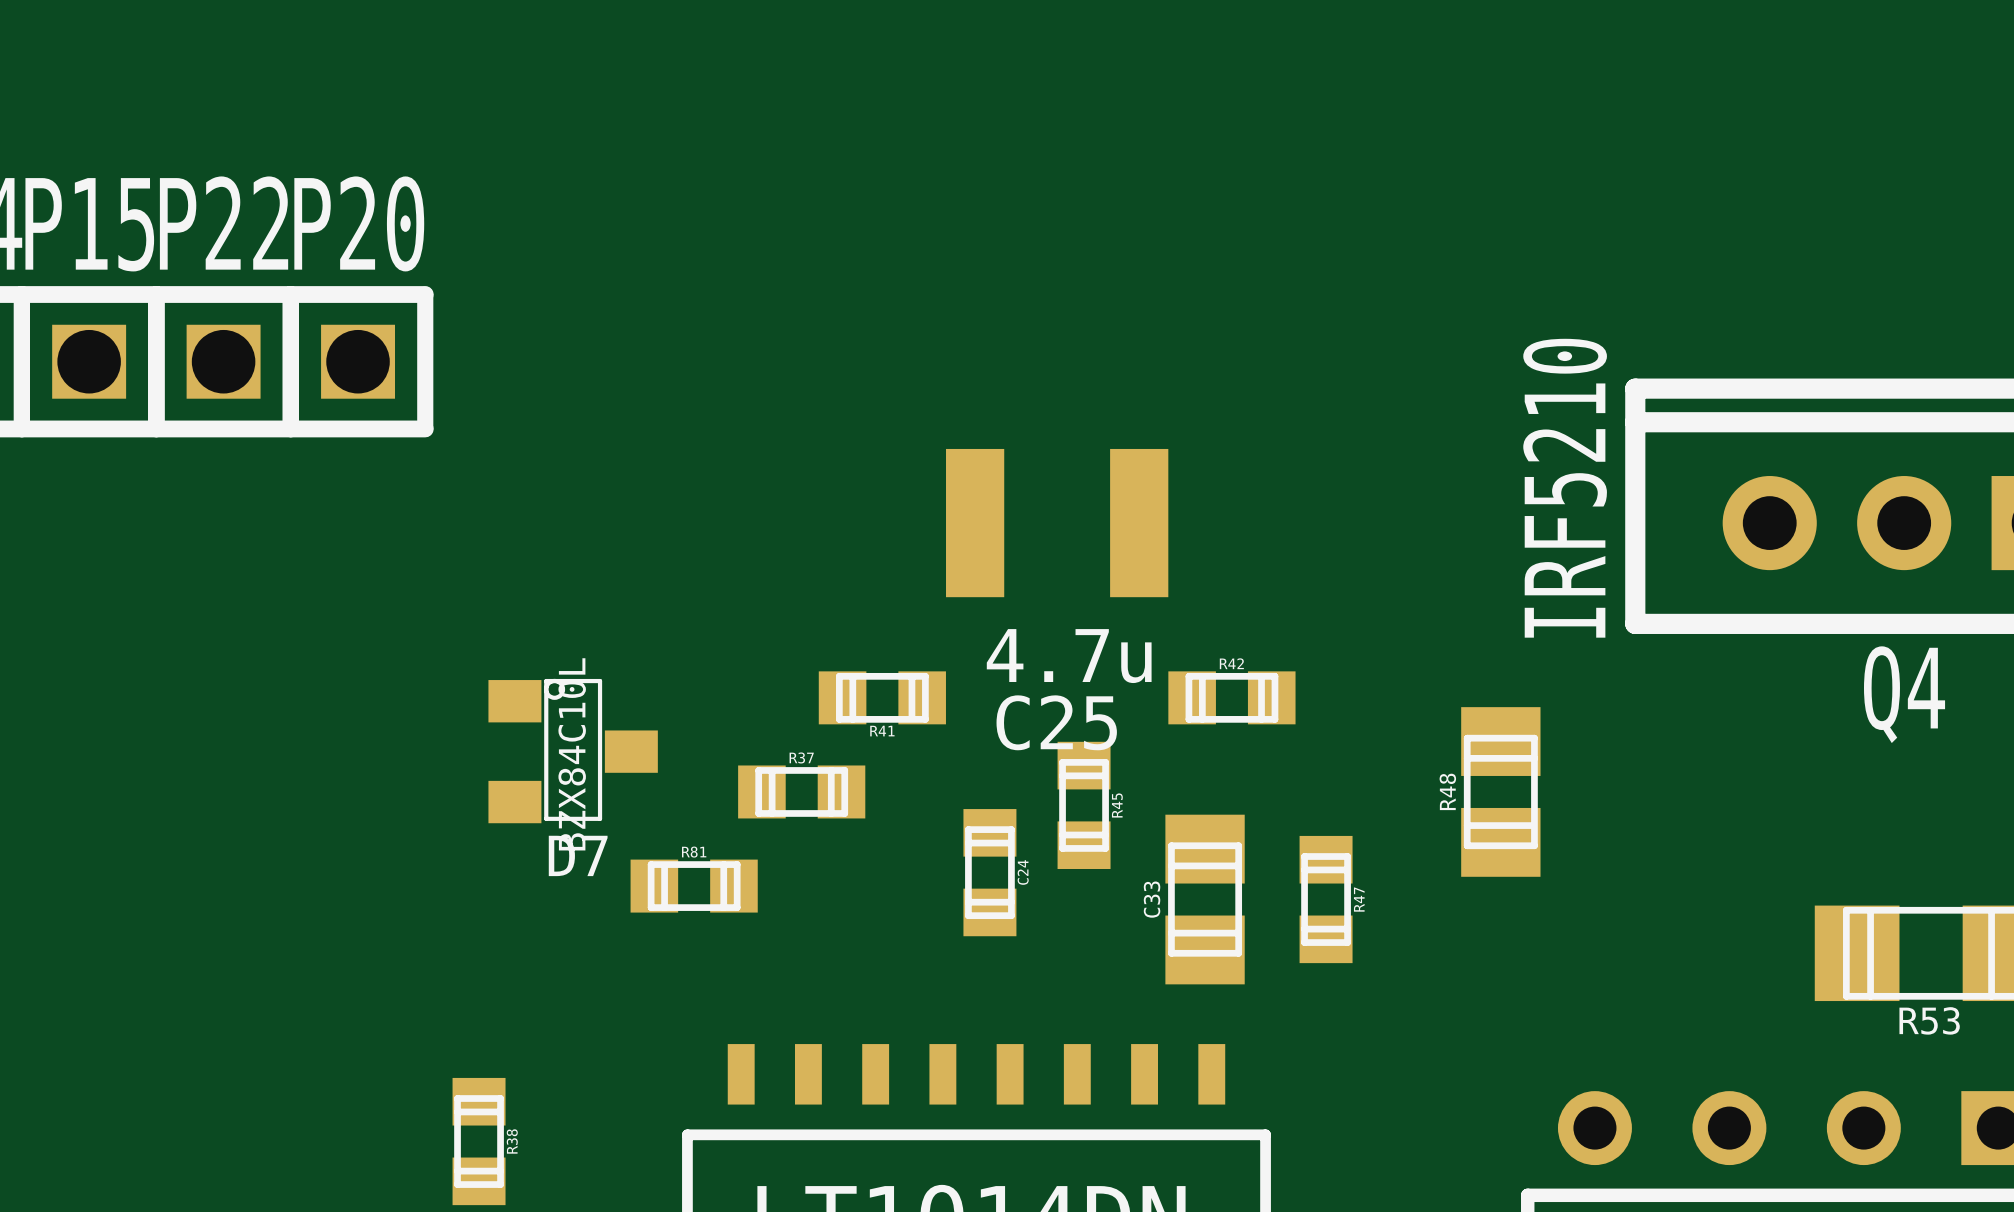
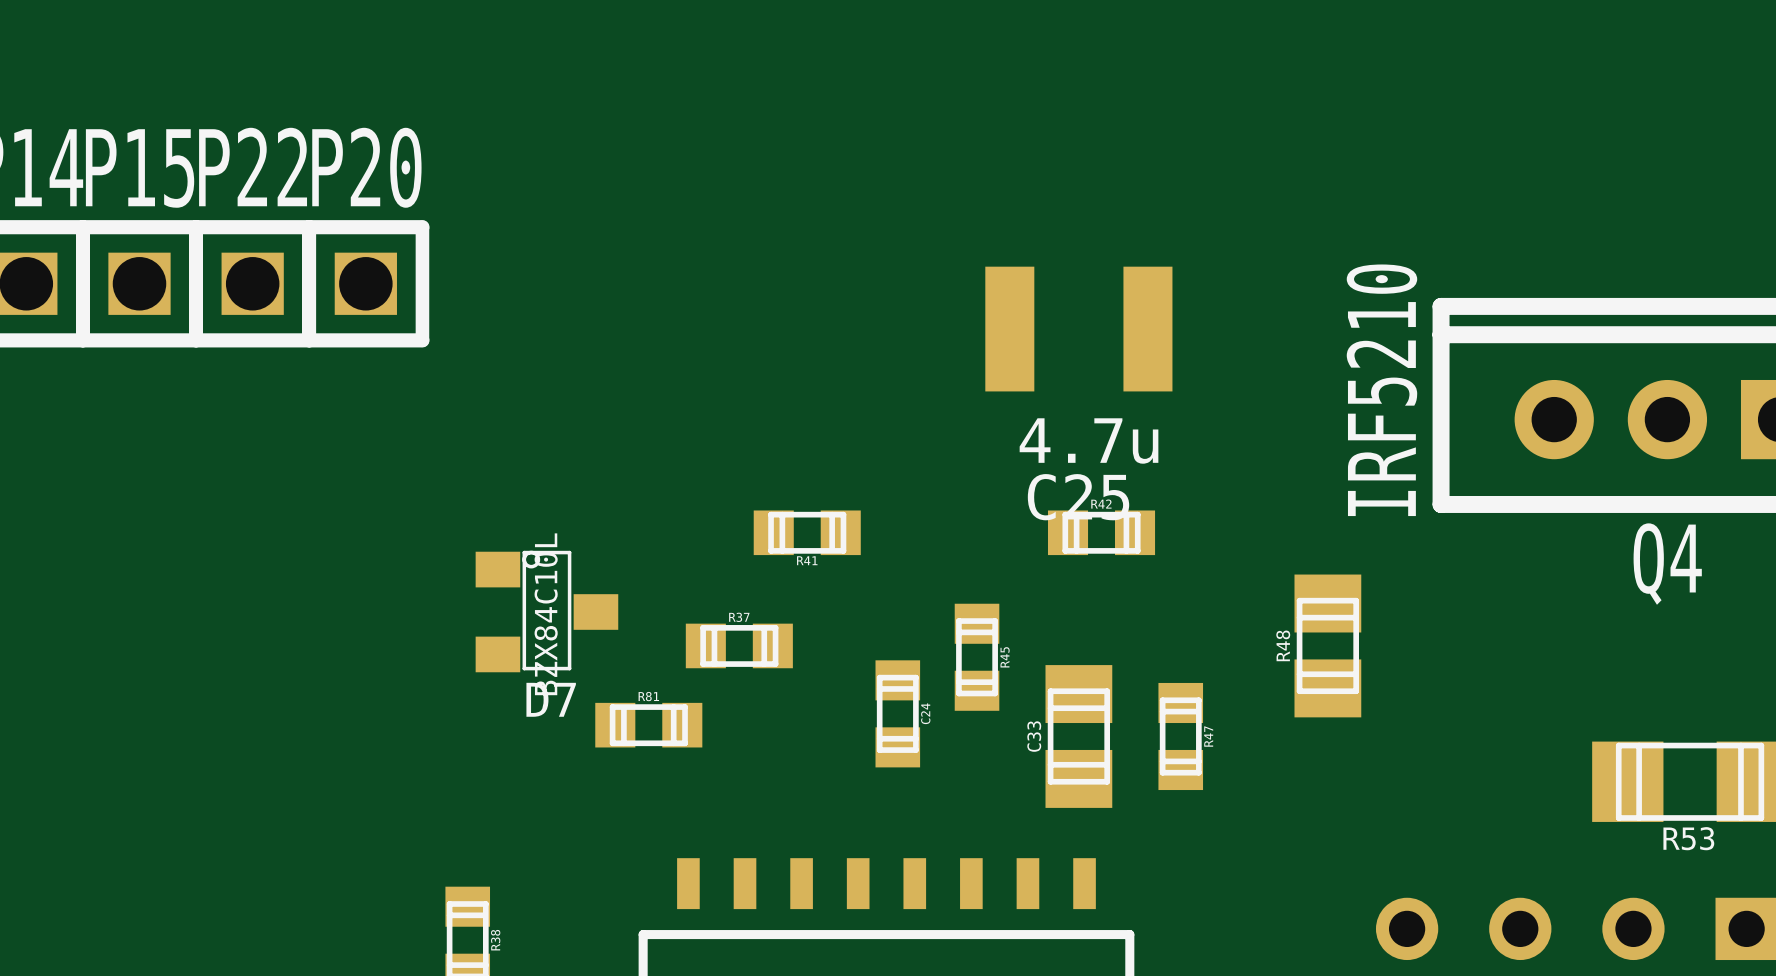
C25 position: (1057, 523) -> (1078, 329)
R41 position: (882, 697) -> (807, 532)
R42 position: (1231, 697) -> (1101, 532)

